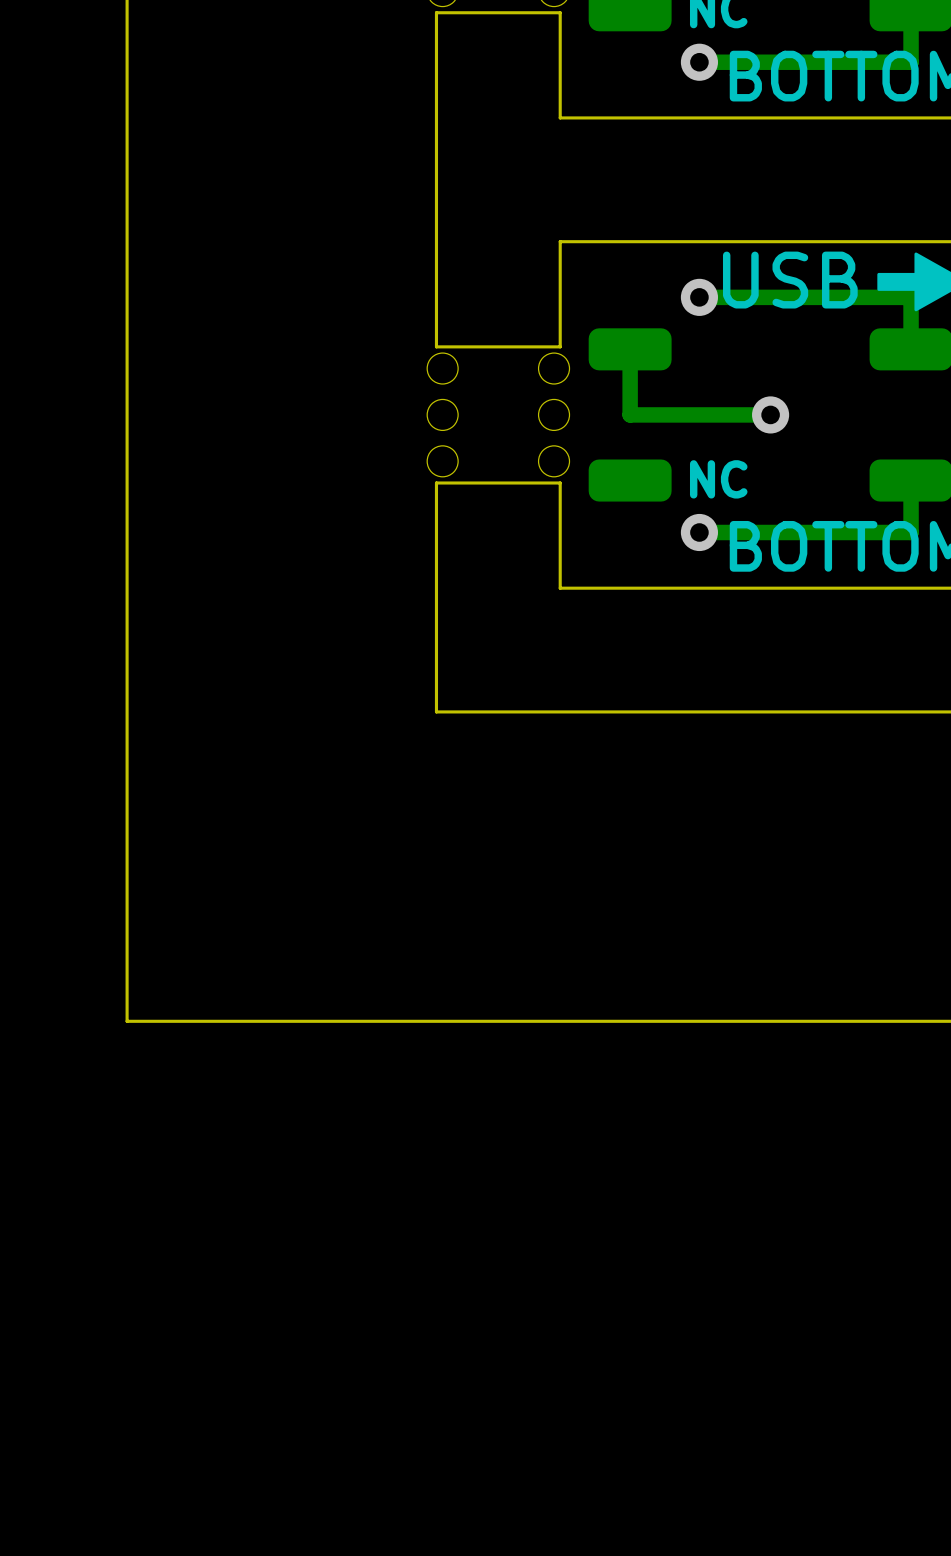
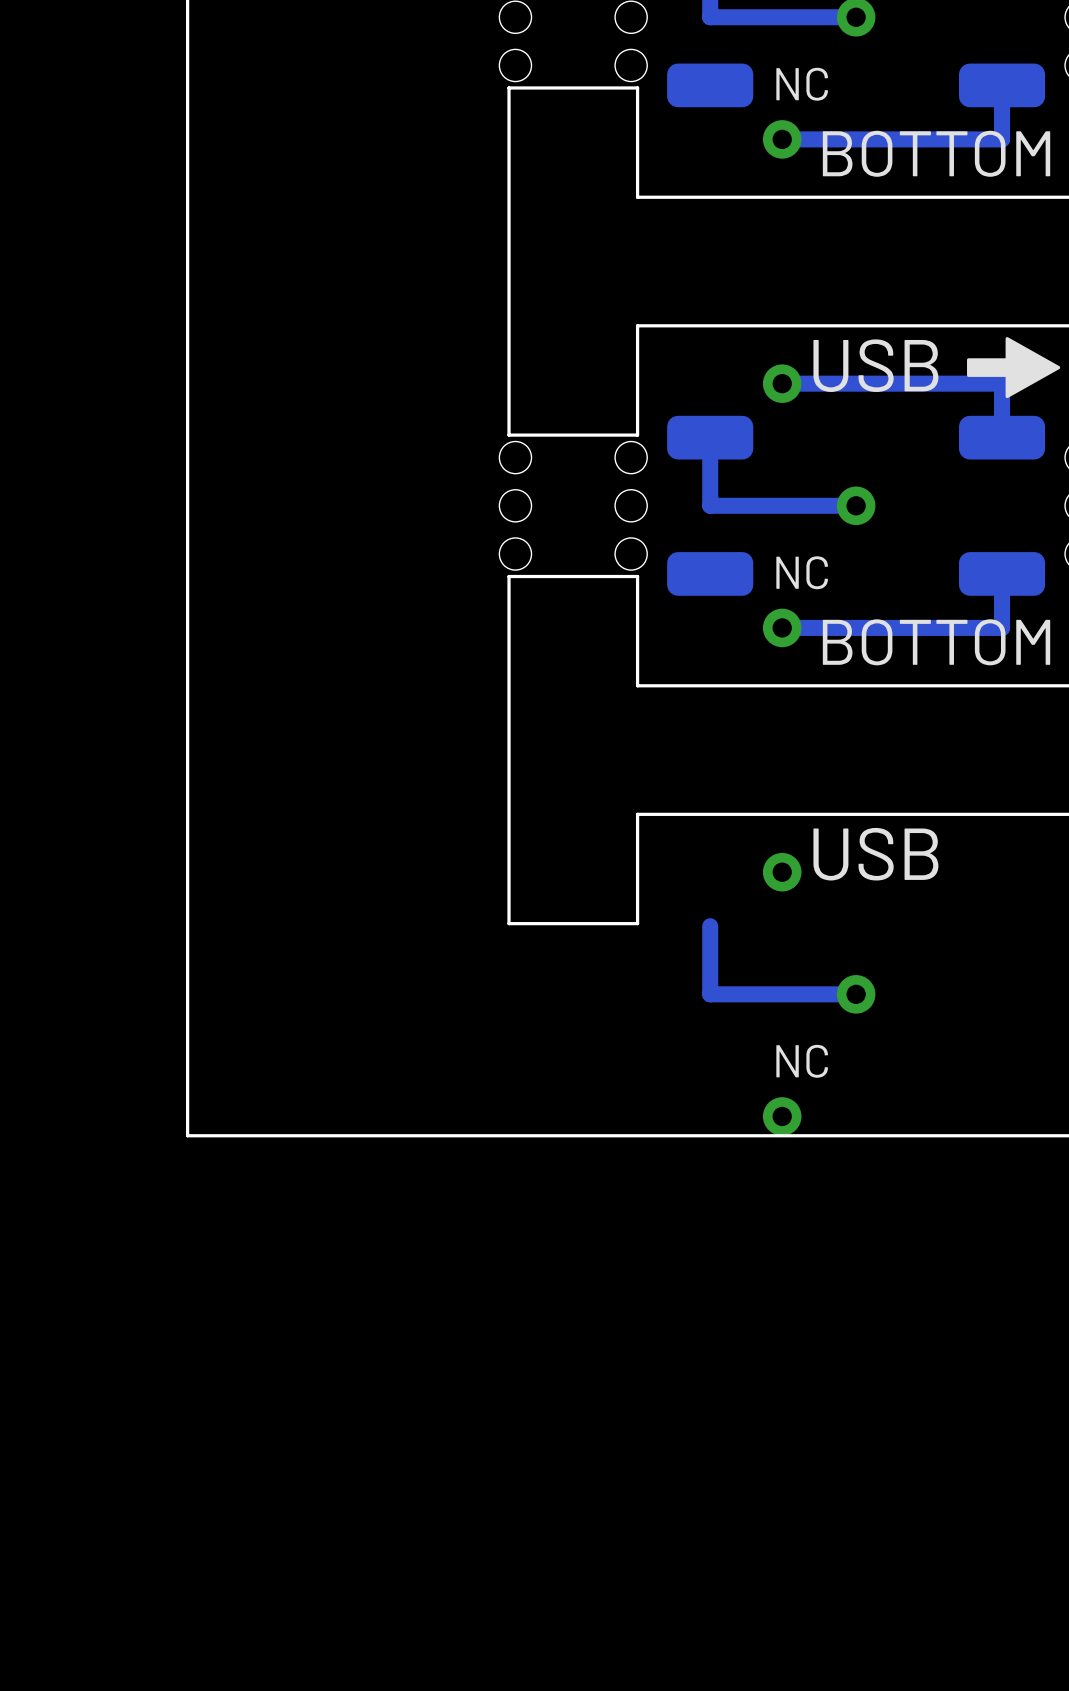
board edge: (560, 711) (436, 711) -> (637, 814) (637, 923) (509, 923) (509, 814)
text: none -> USB (875, 854)
via: none -> (782, 872)
track: none -> (710, 926) (710, 994) (856, 994)
via: none -> (856, 994)
text: none -> NC (802, 1061)
via: none -> (782, 1116)

